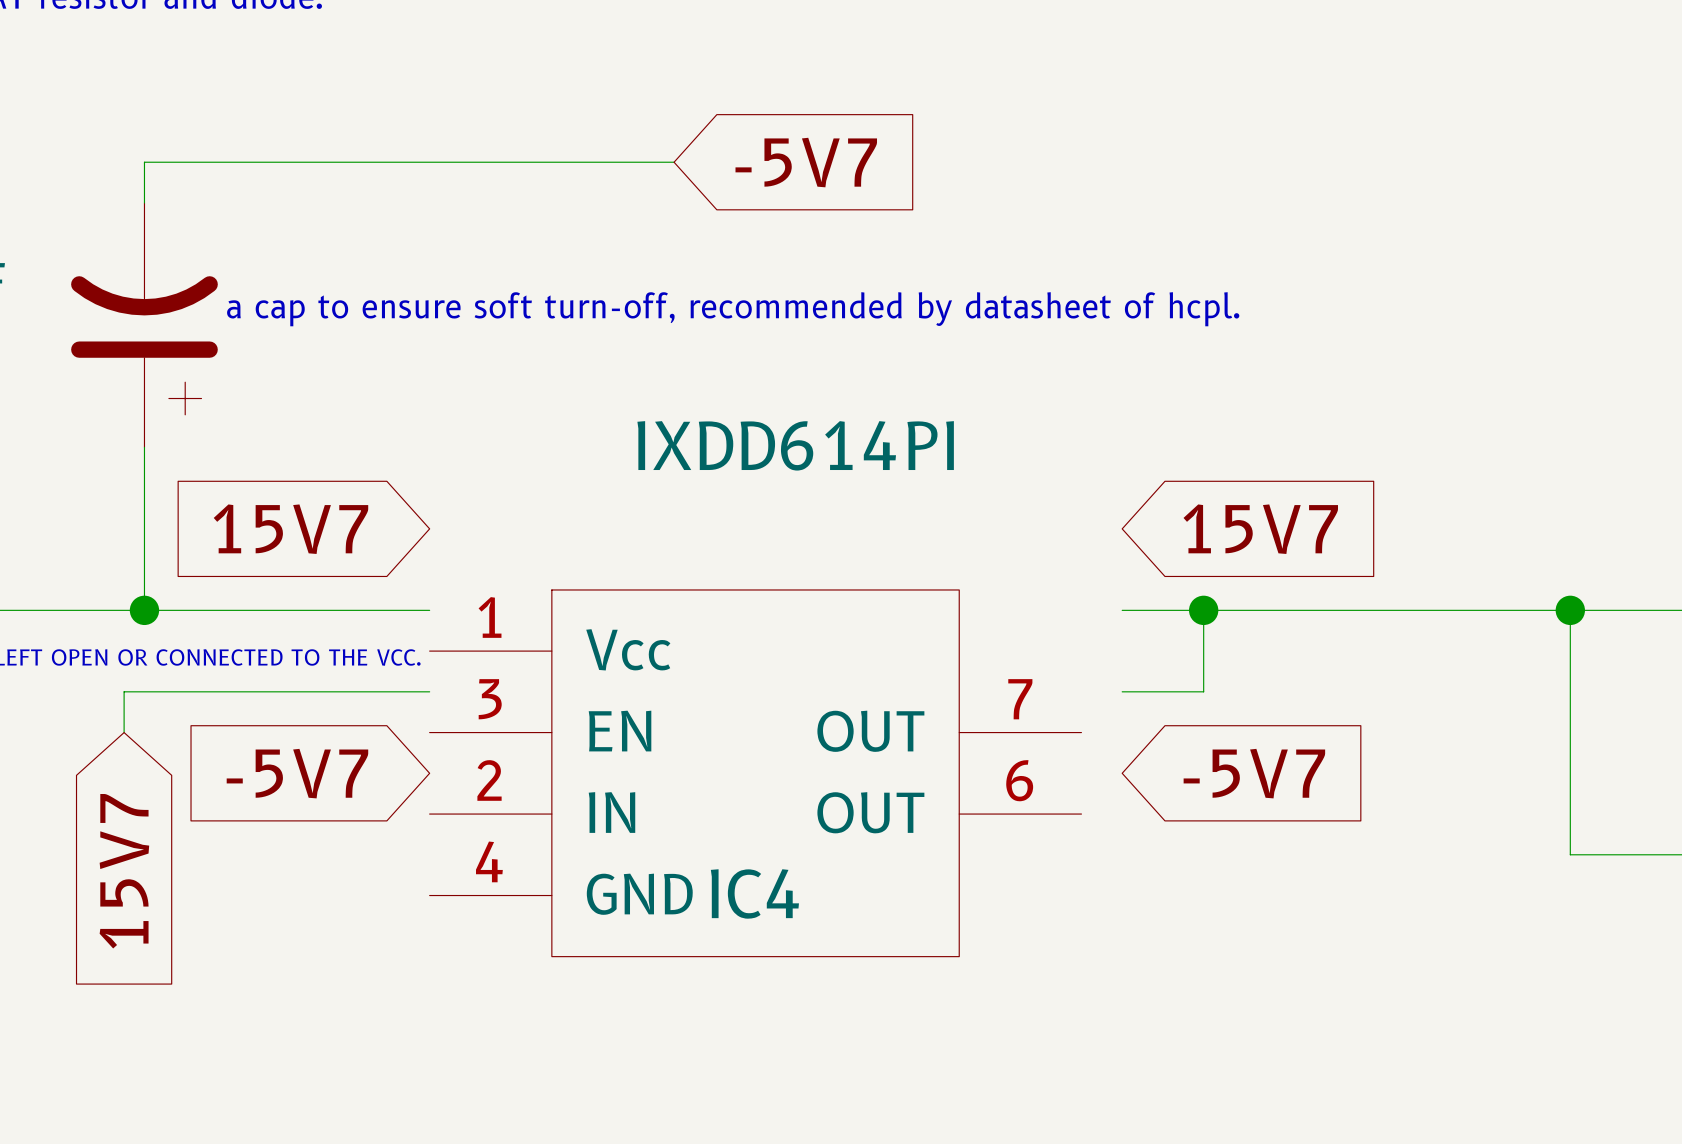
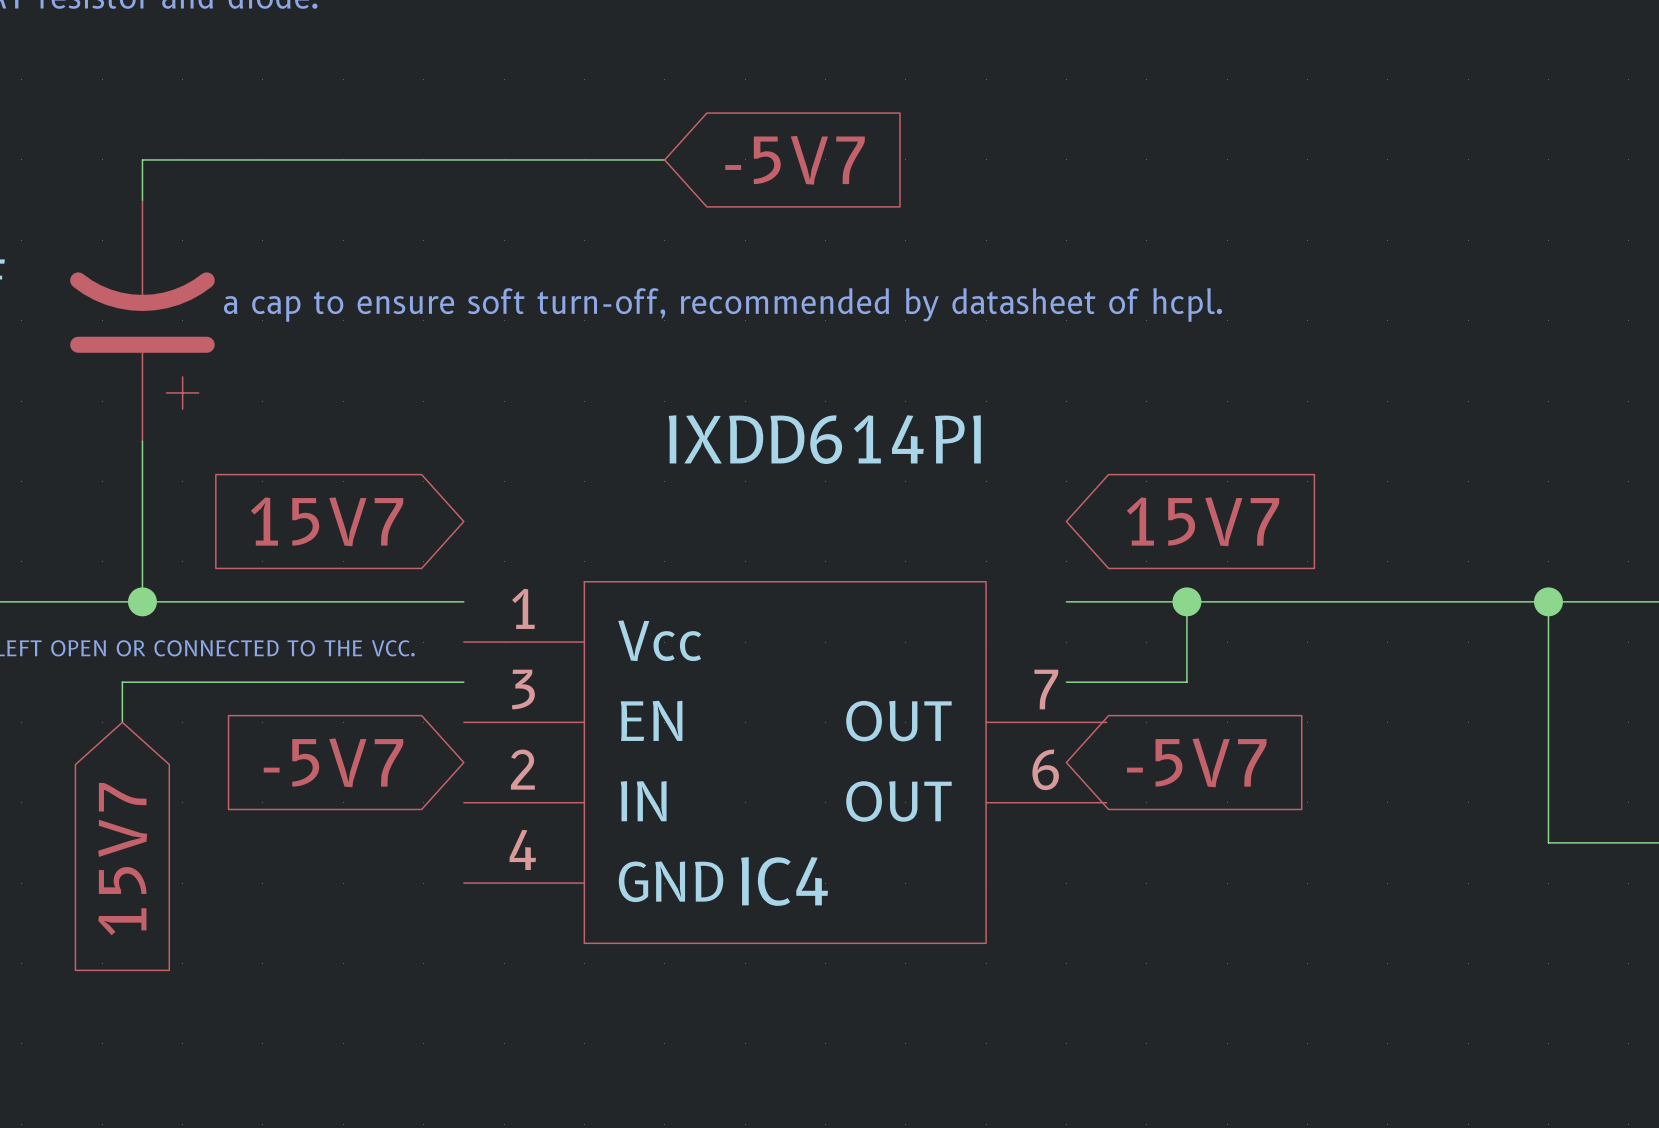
global label position: 15V7 (290, 529) -> 15V7 (327, 521)
global label position: 15V7 (1260, 529) -> 15V7 (1203, 521)
wire: none -> (423, 601) (463, 601)
wire: none -> (1066, 601) (1106, 601)
wire: none -> (423, 682) (463, 682)
wire: none -> (1066, 682) (1106, 682)
global label position: -5V7 (297, 773) -> -5V7 (333, 762)
IC4 position: (755, 773) -> (785, 762)
global label position: -5V7 (1254, 773) -> -5V7 (1196, 762)

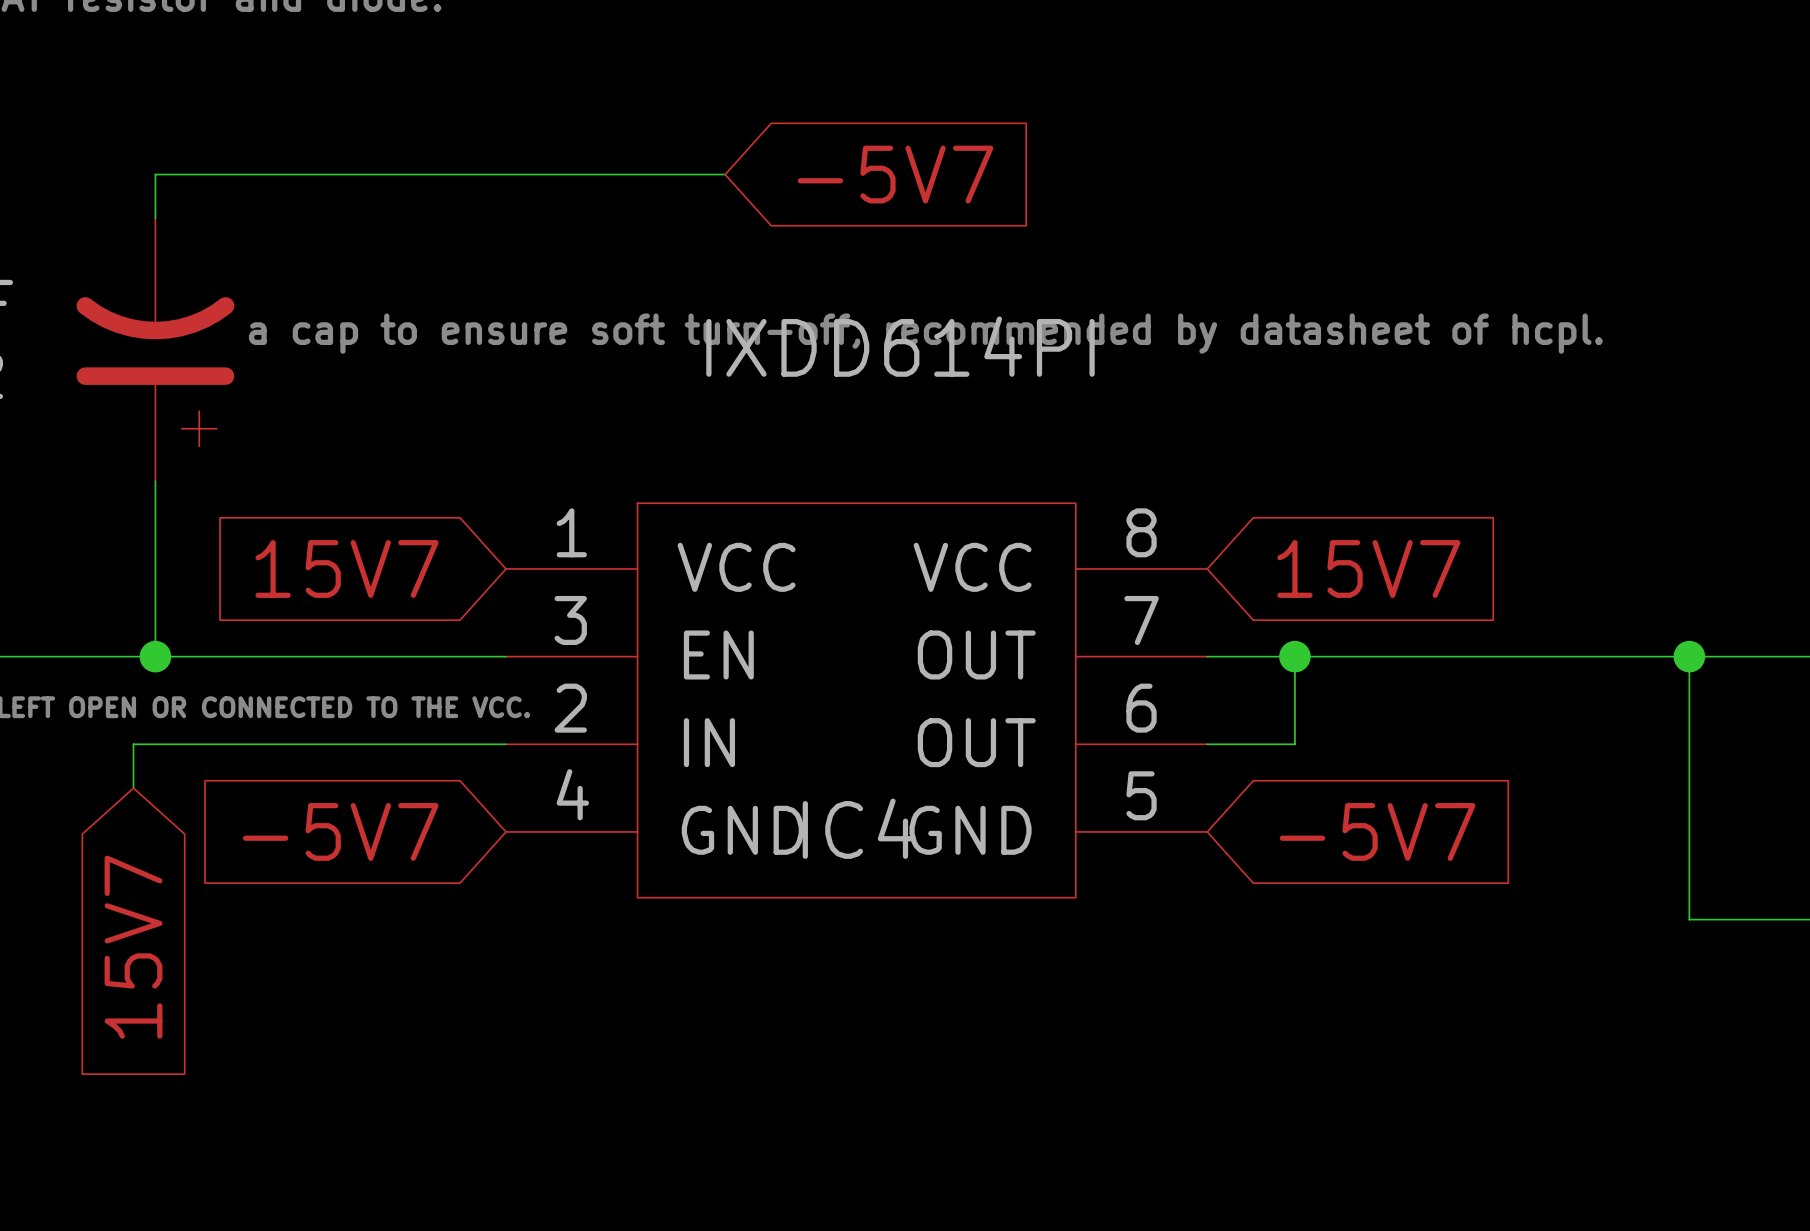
global label position: 15V7 (1203, 521) -> 15V7 (1368, 568)
IC4 symbol: [463, 581, 1107, 944] -> [506, 503, 1208, 898]
global label position: -5V7 (1196, 762) -> -5V7 (1377, 831)

